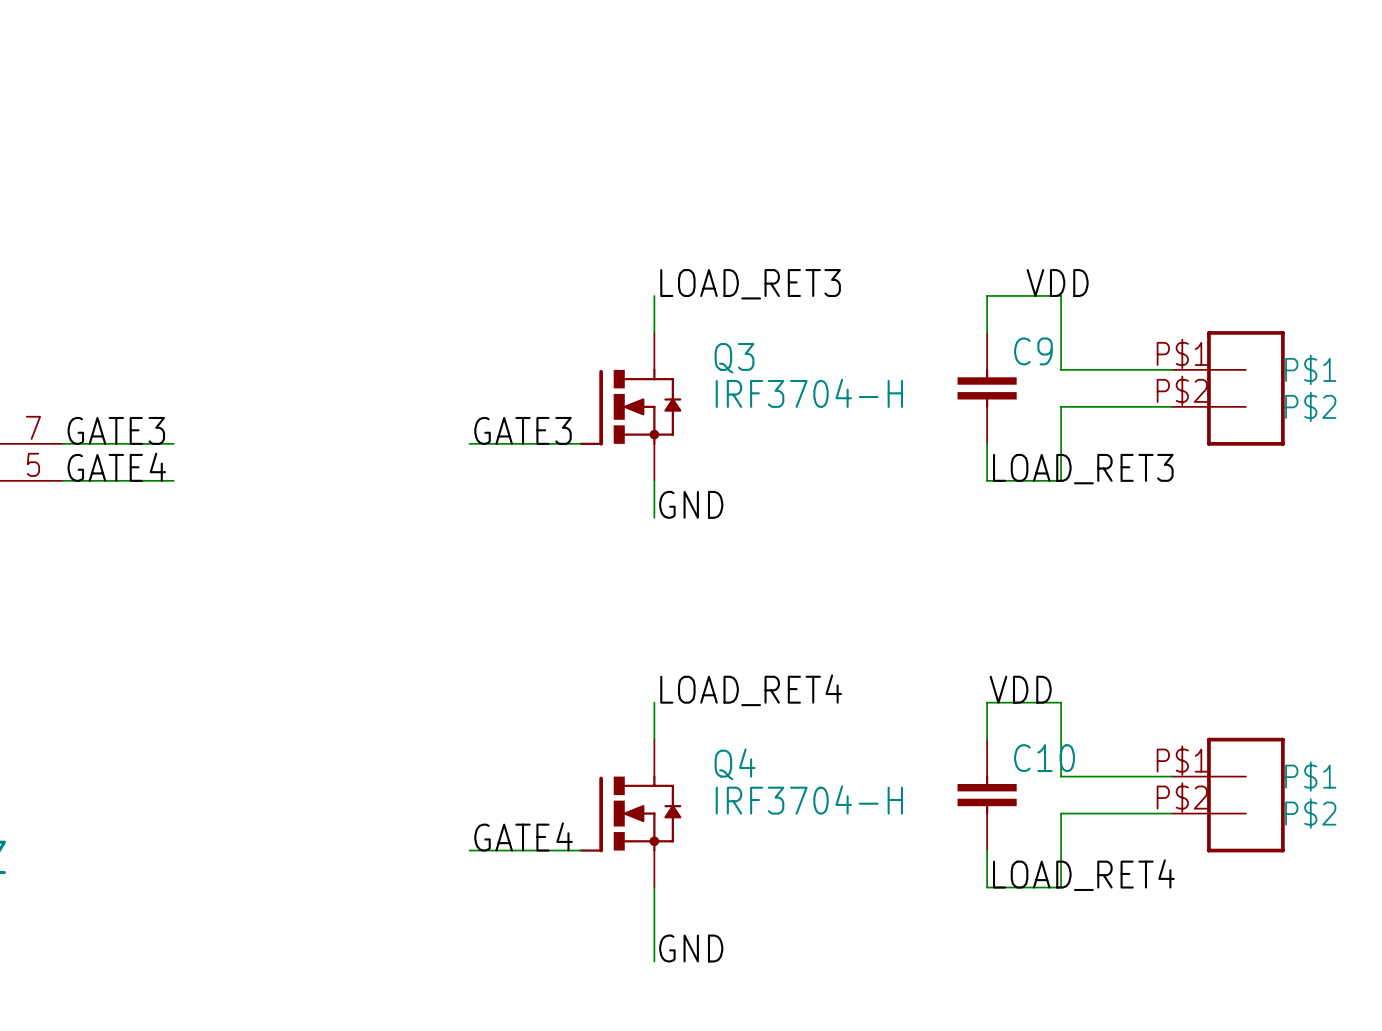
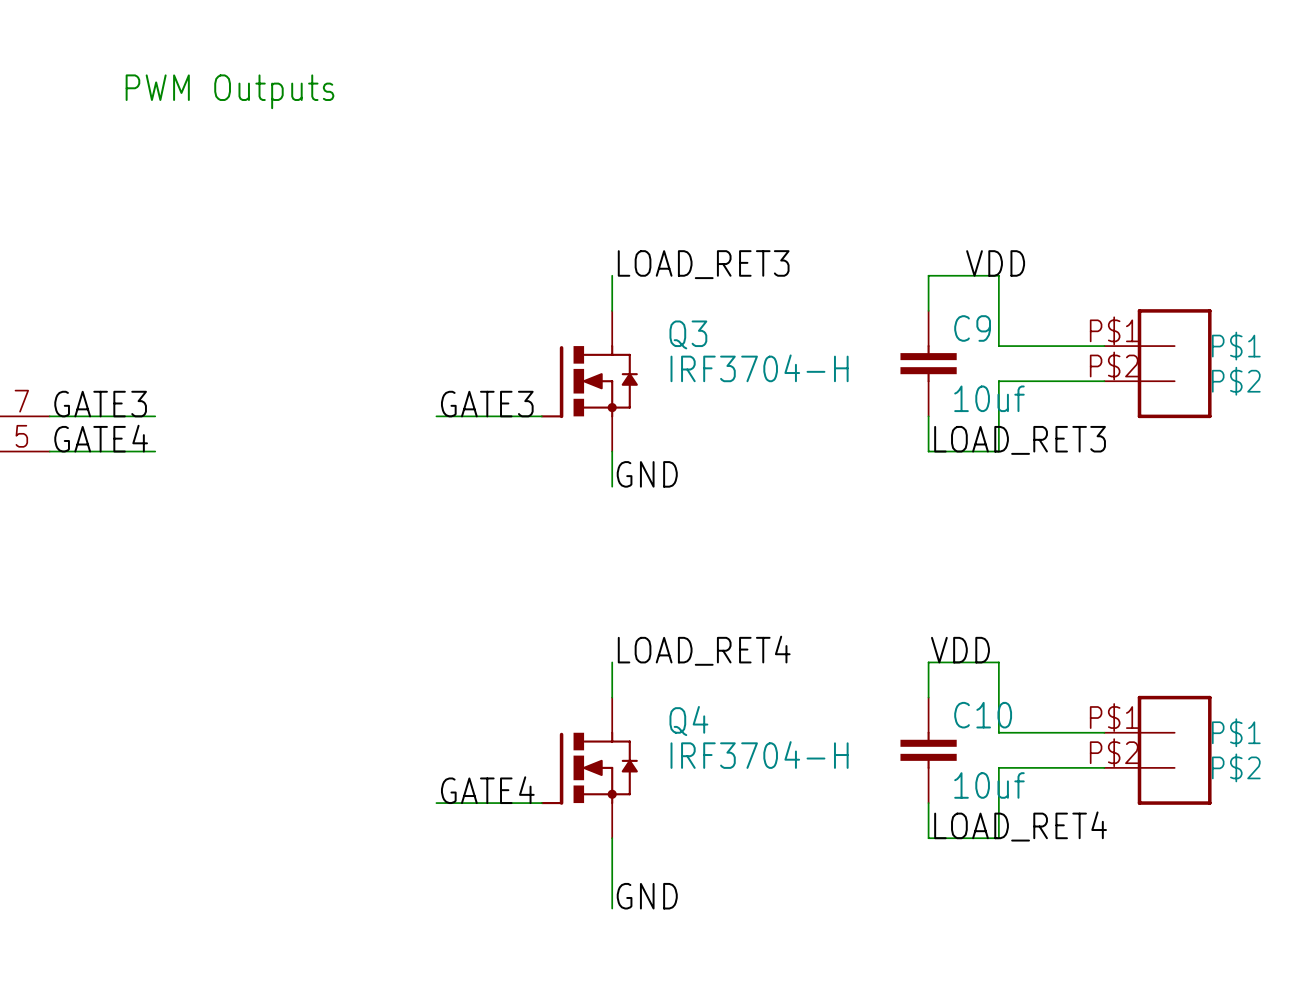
text: none -> PWM Outputs (229, 91)
C9 value: none -> 10uf (989, 398)
C10 value: none -> 10uf (989, 785)

